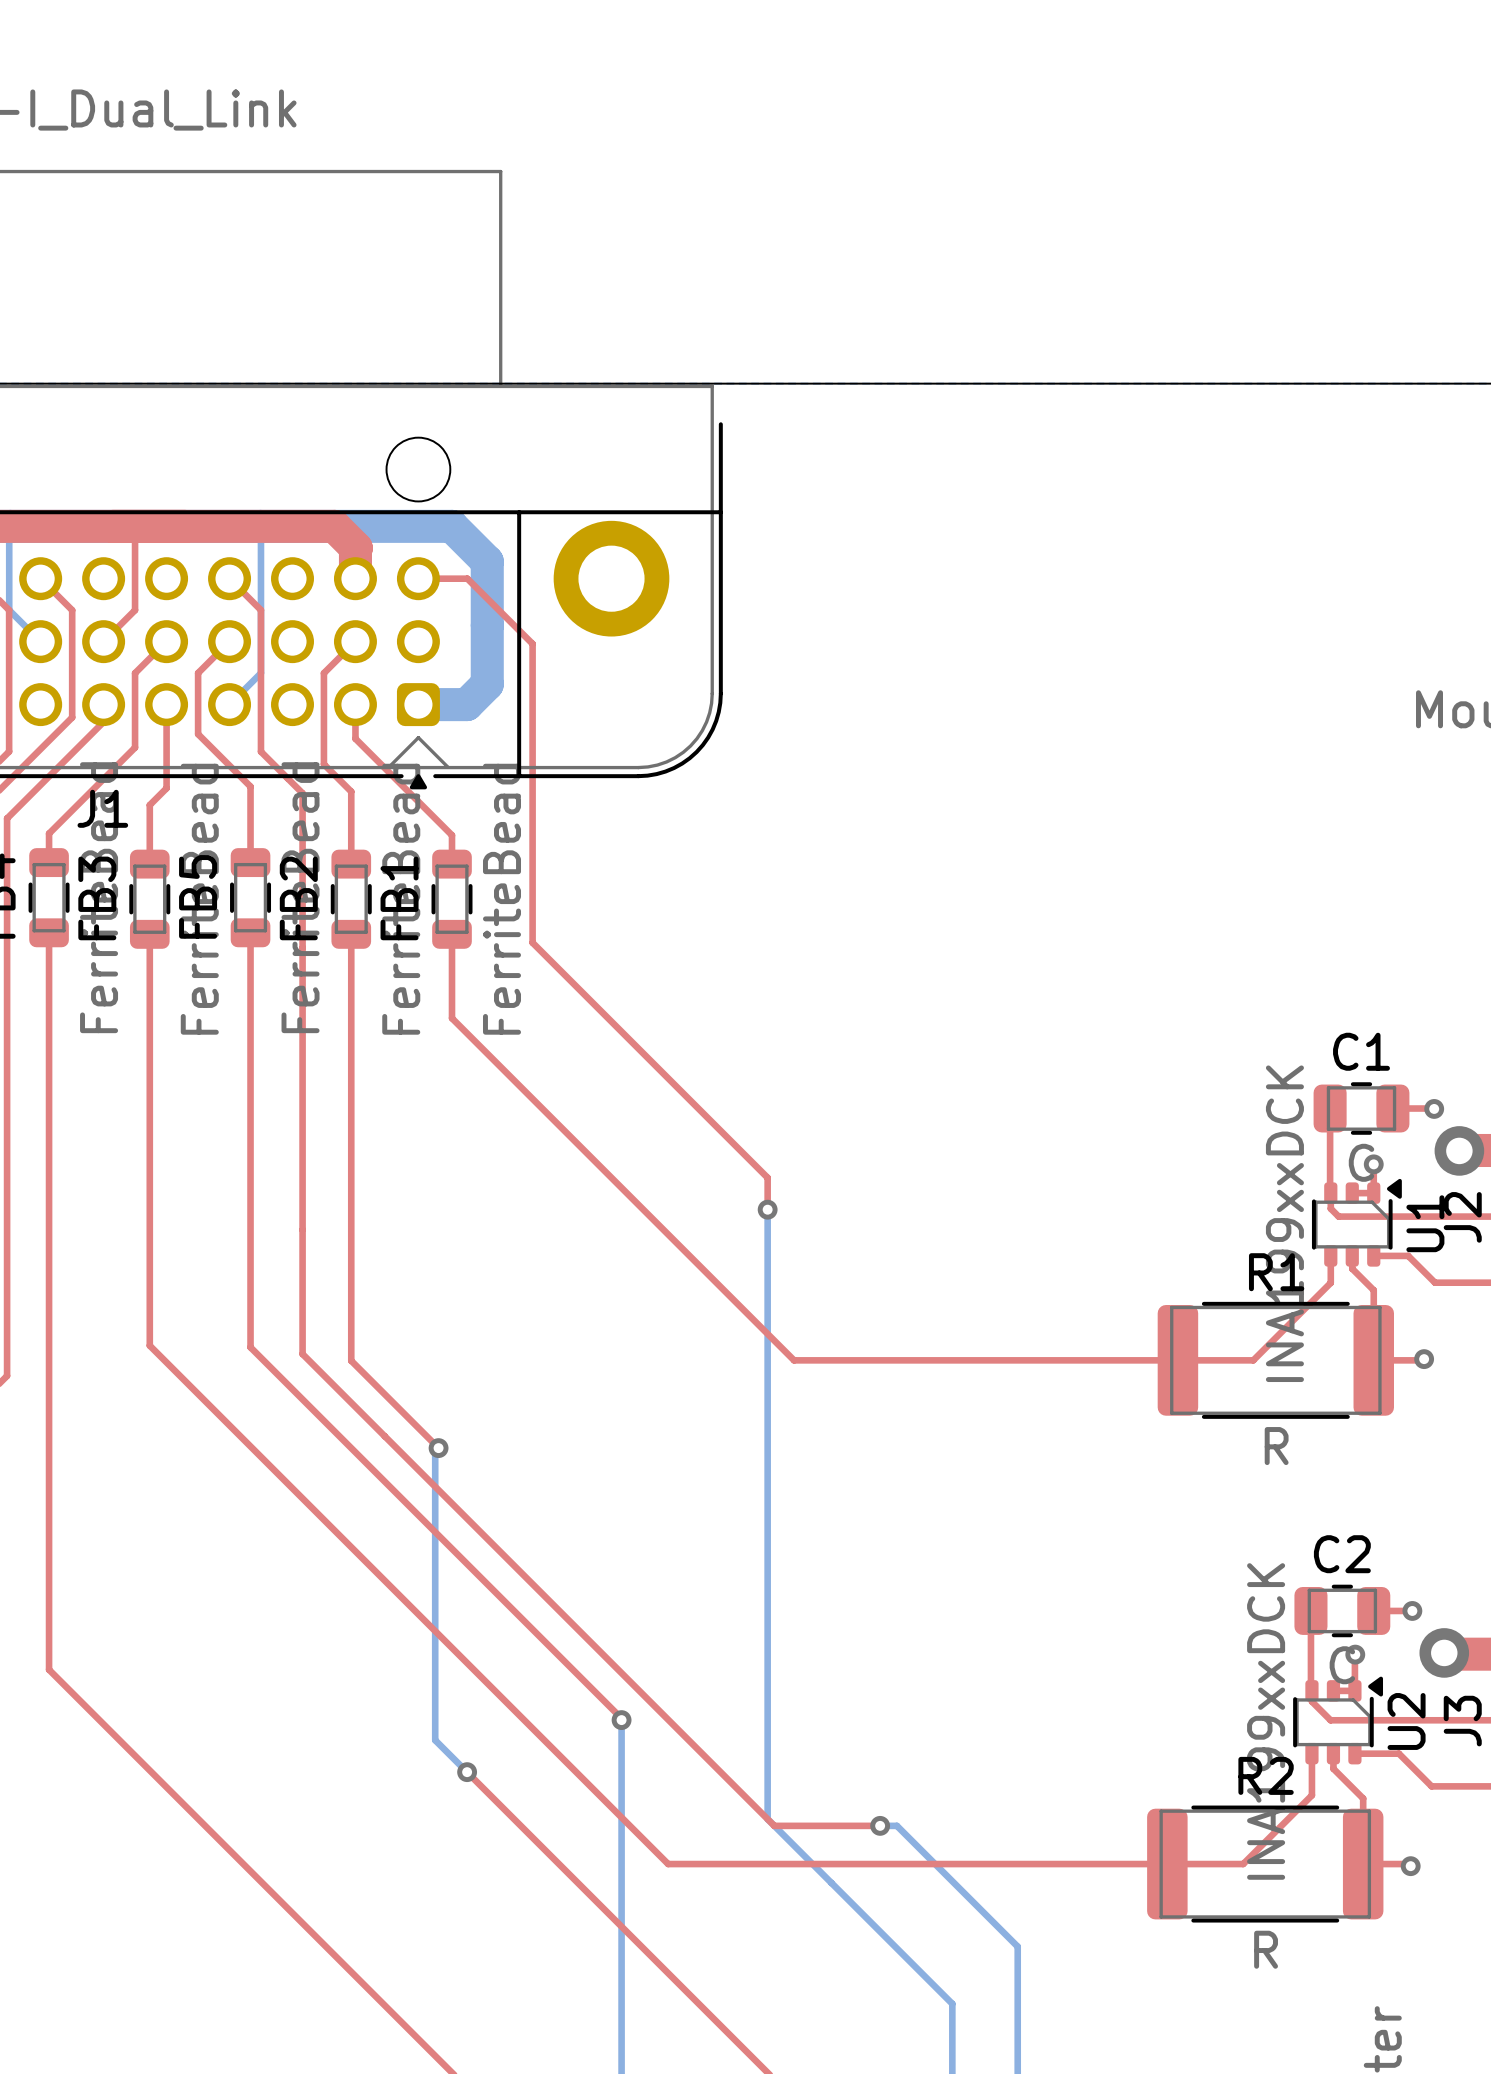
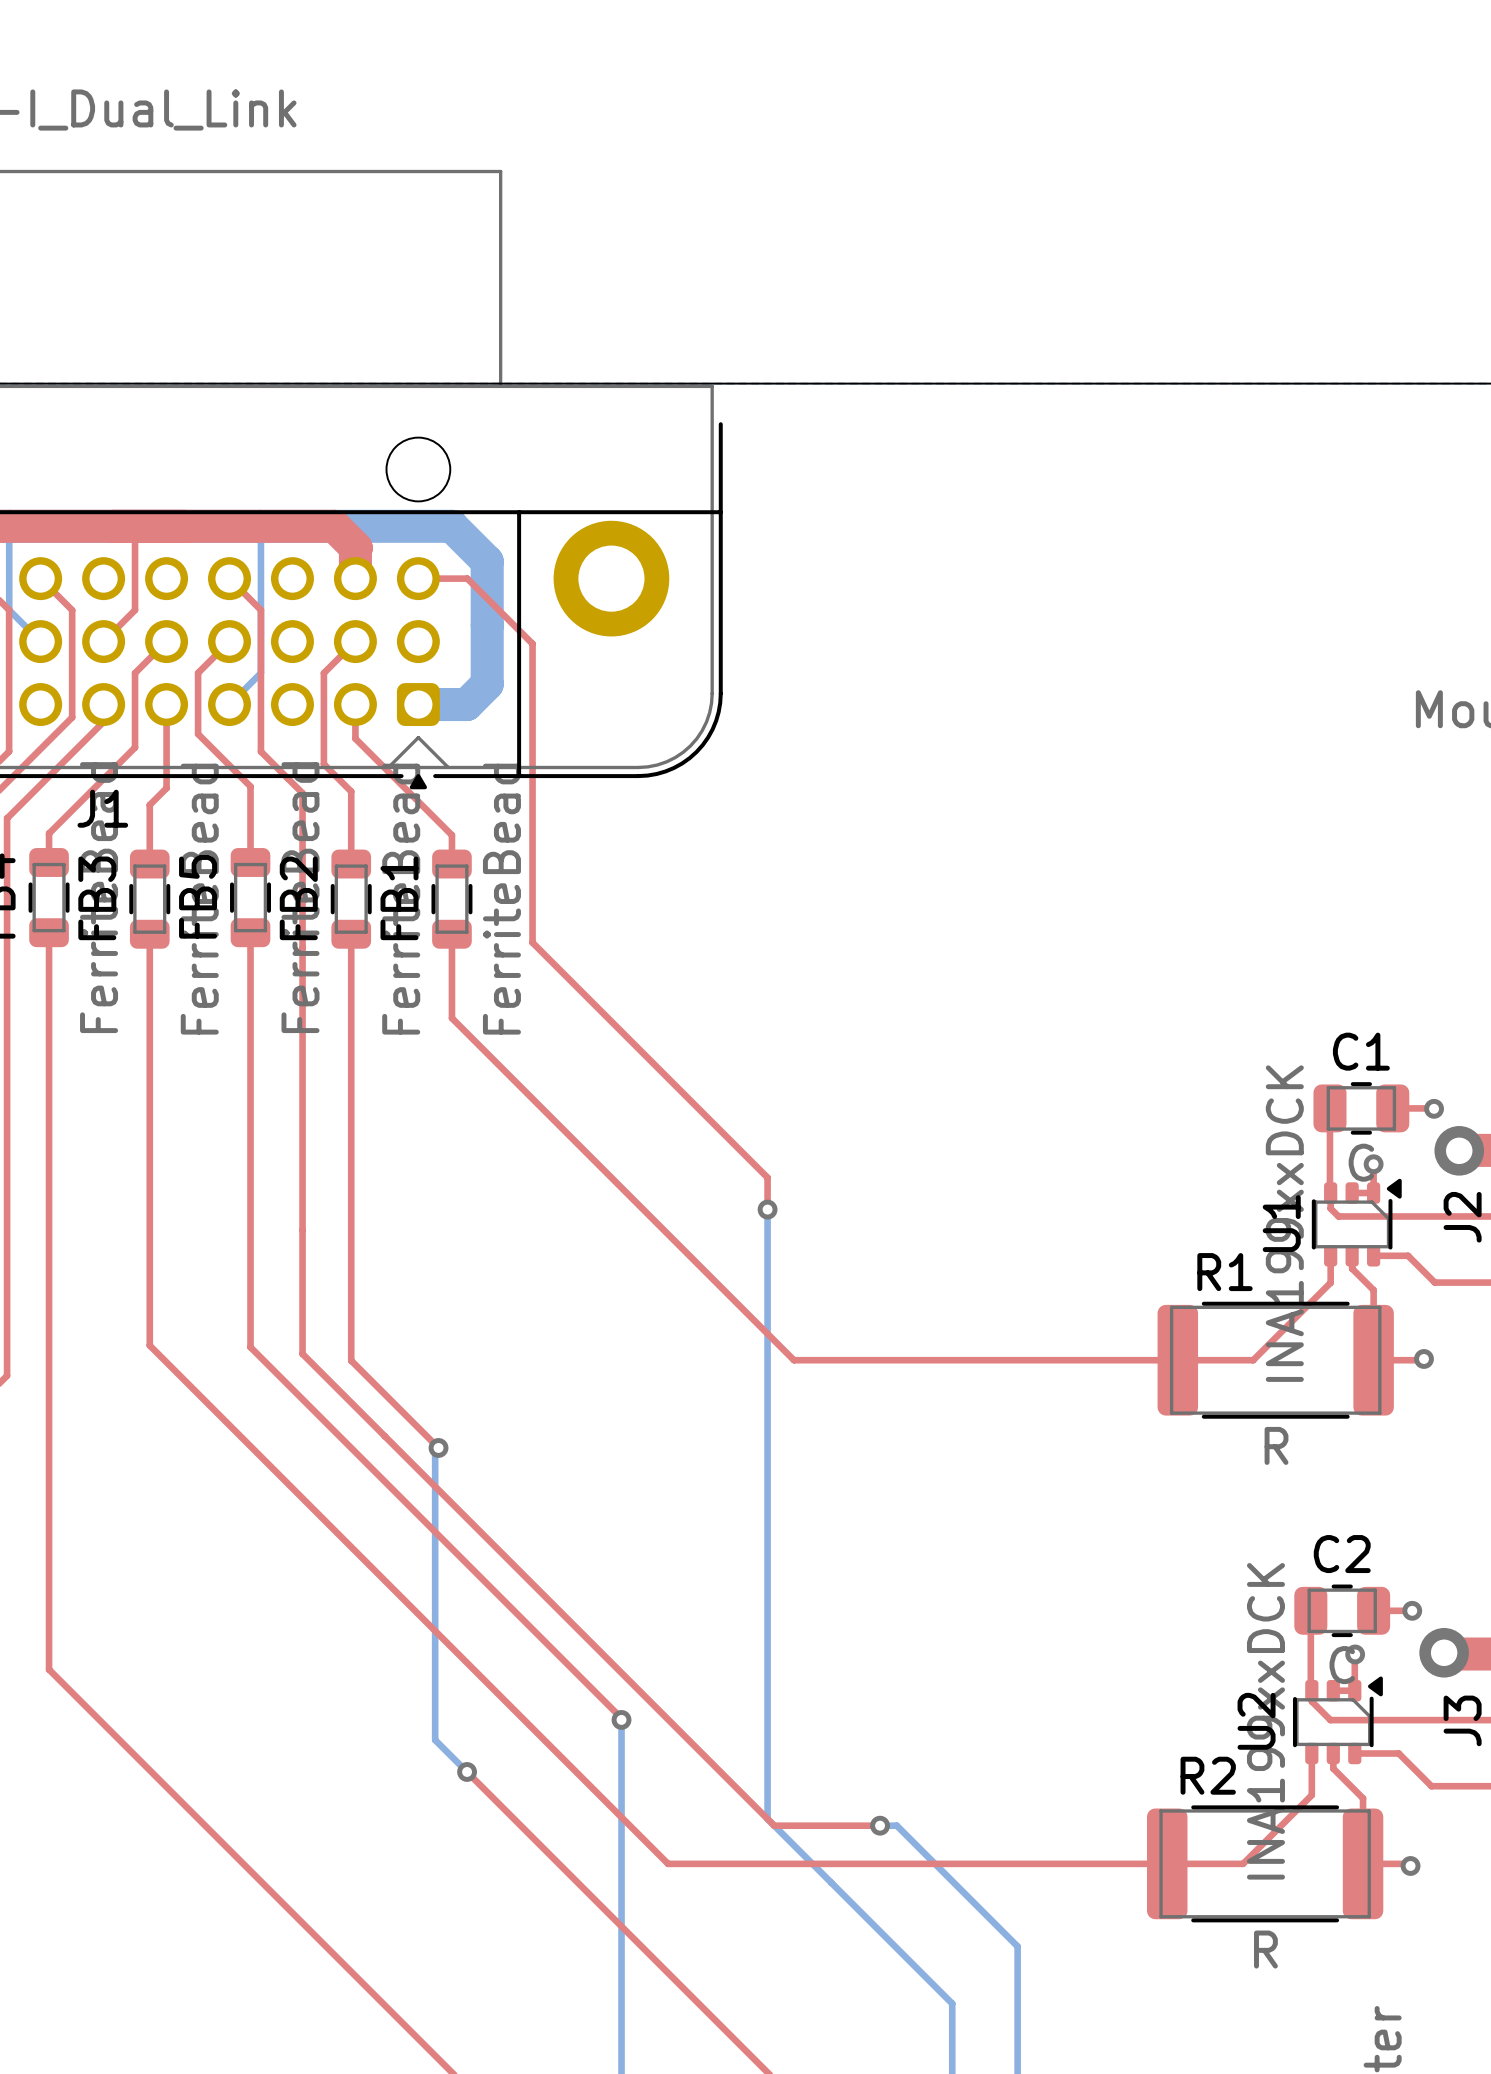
U1 name position: U1 (1425, 1223) -> U1 (1281, 1223)
R1 name position: R1 (1276, 1272) -> R1 (1224, 1272)
U2 name position: U2 (1406, 1721) -> U2 (1256, 1721)
R2 name position: R2 (1266, 1775) -> R2 (1208, 1775)

